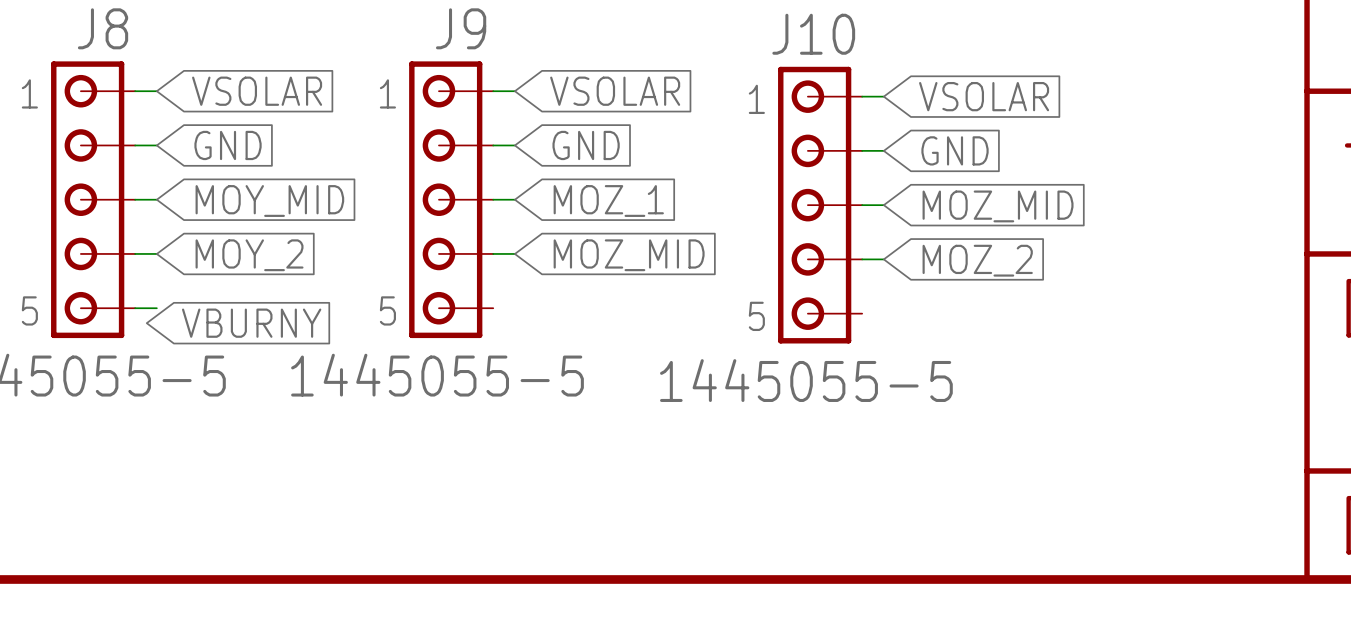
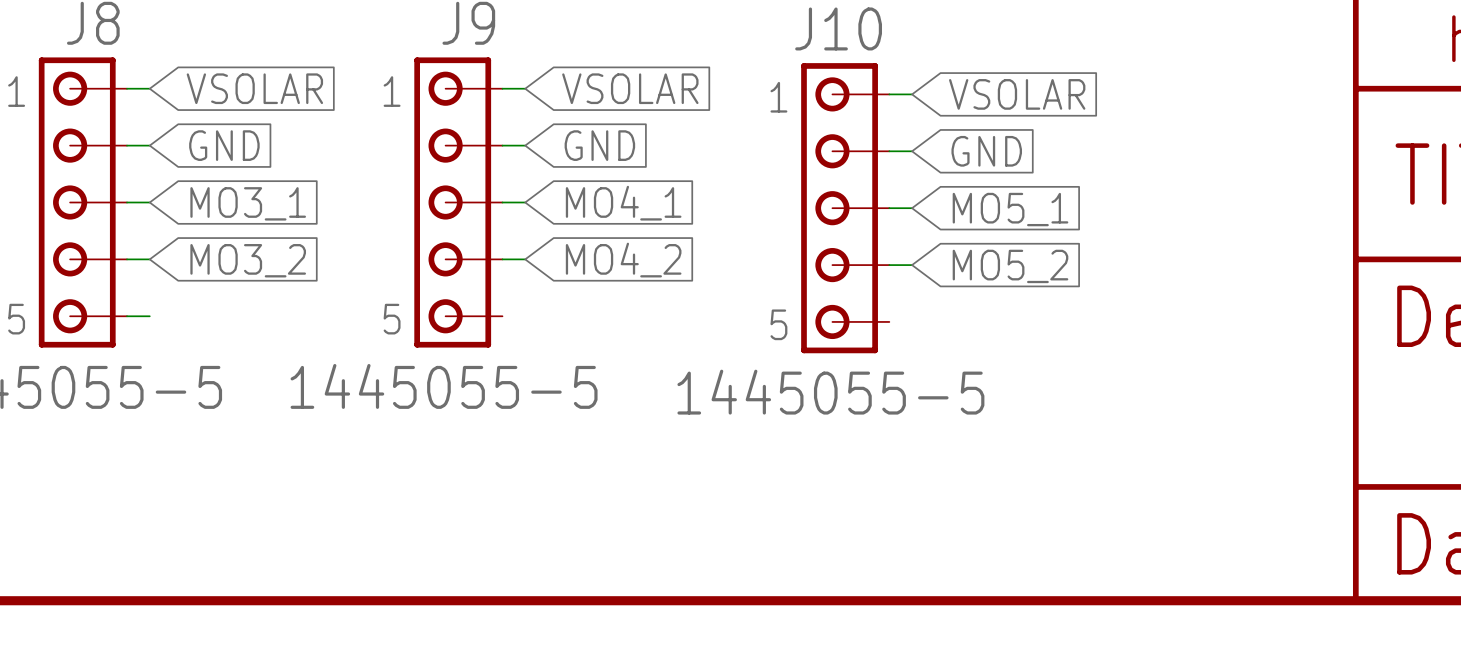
global label: MOY_MID (269, 201) -> MO3_1 (248, 203)
global label: MOZ_1 (608, 201) -> MO4_1 (623, 203)
global label: MOZ_MID (998, 206) -> MO5_1 (1010, 209)
global label: MOY_2 (249, 255) -> MO3_2 (248, 260)
global label: MOZ_MID (629, 255) -> MO4_2 (623, 260)
global label: MOZ_2 (977, 260) -> MO5_2 (1010, 266)
global label: VBURNY (251, 323) -> none

